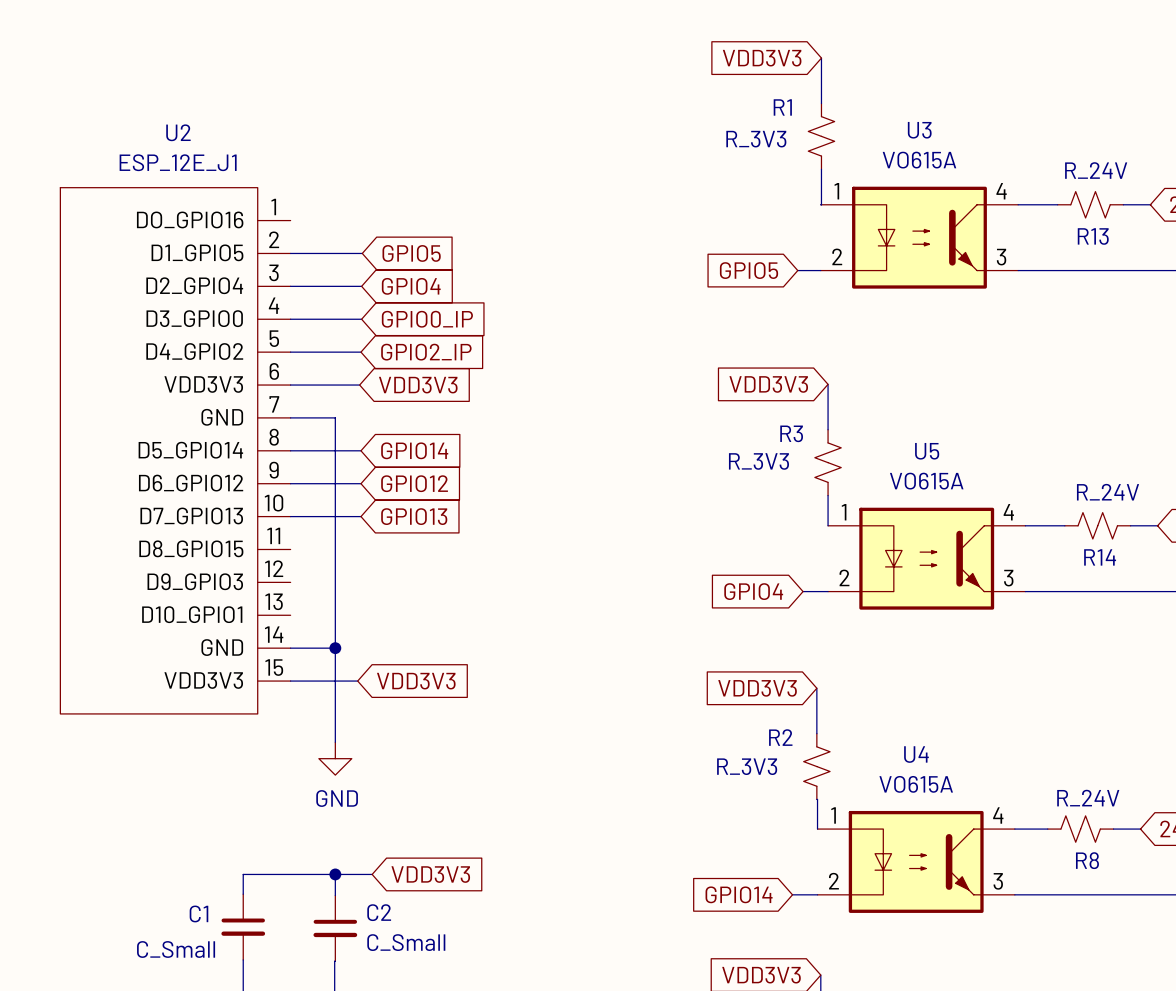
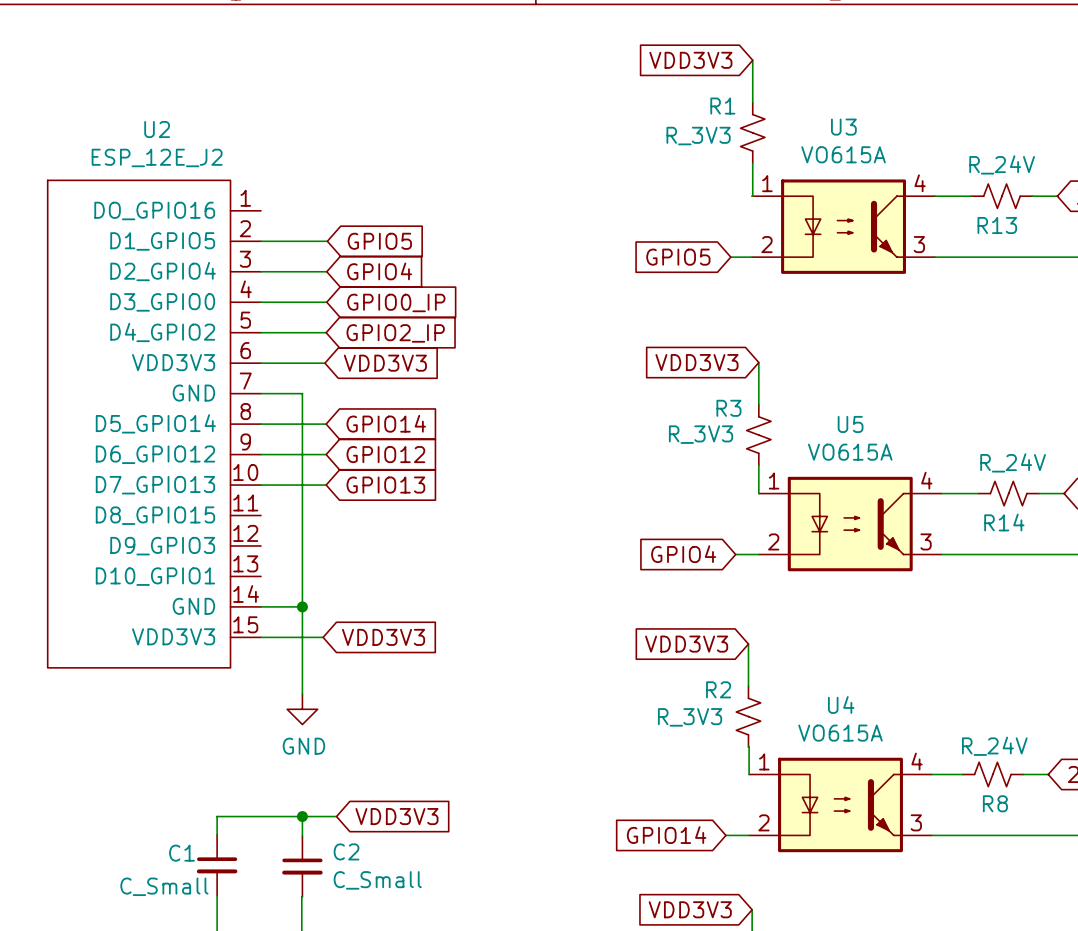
U2 value: ESP_12E_J1 (178, 162) -> ESP_12E_J2 (157, 157)

